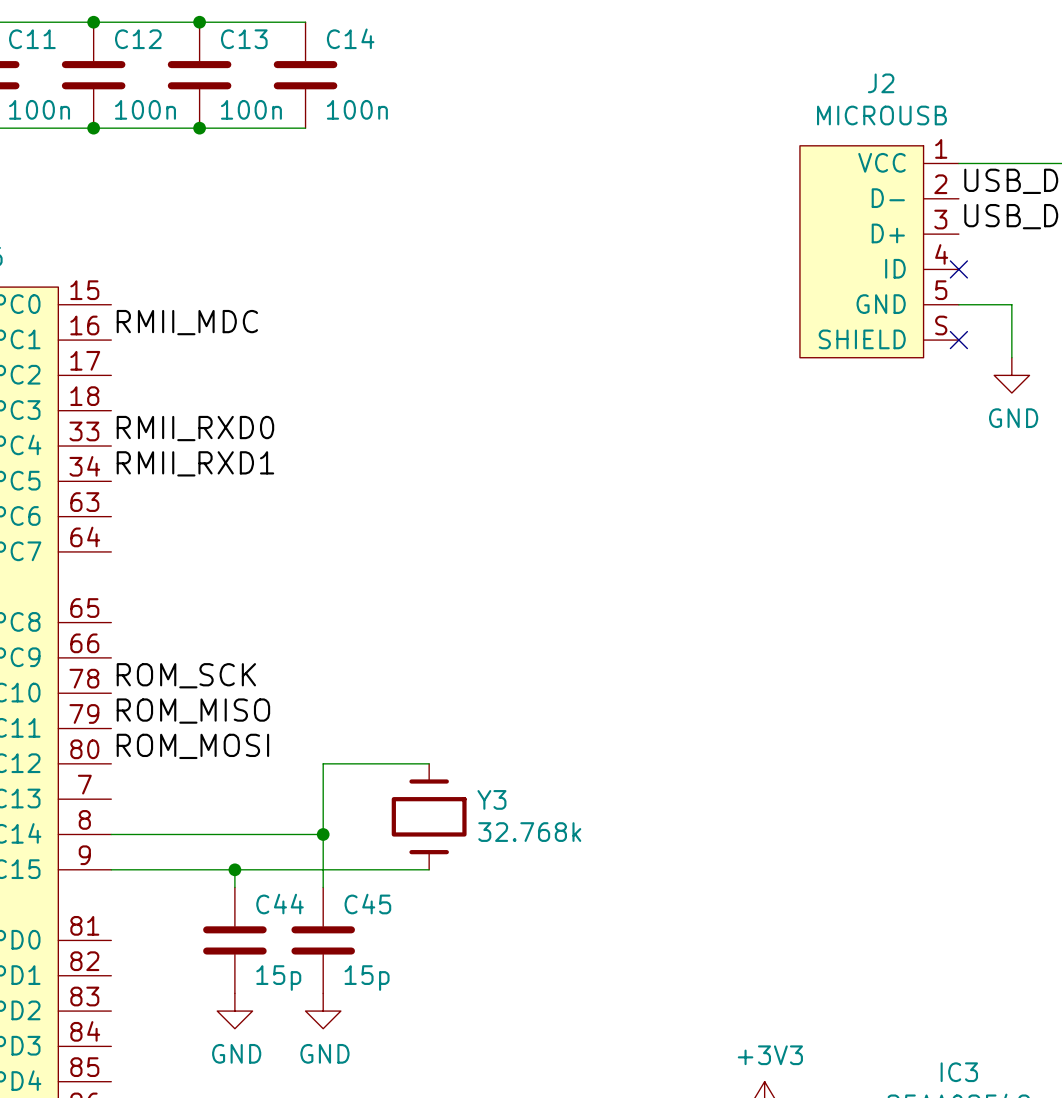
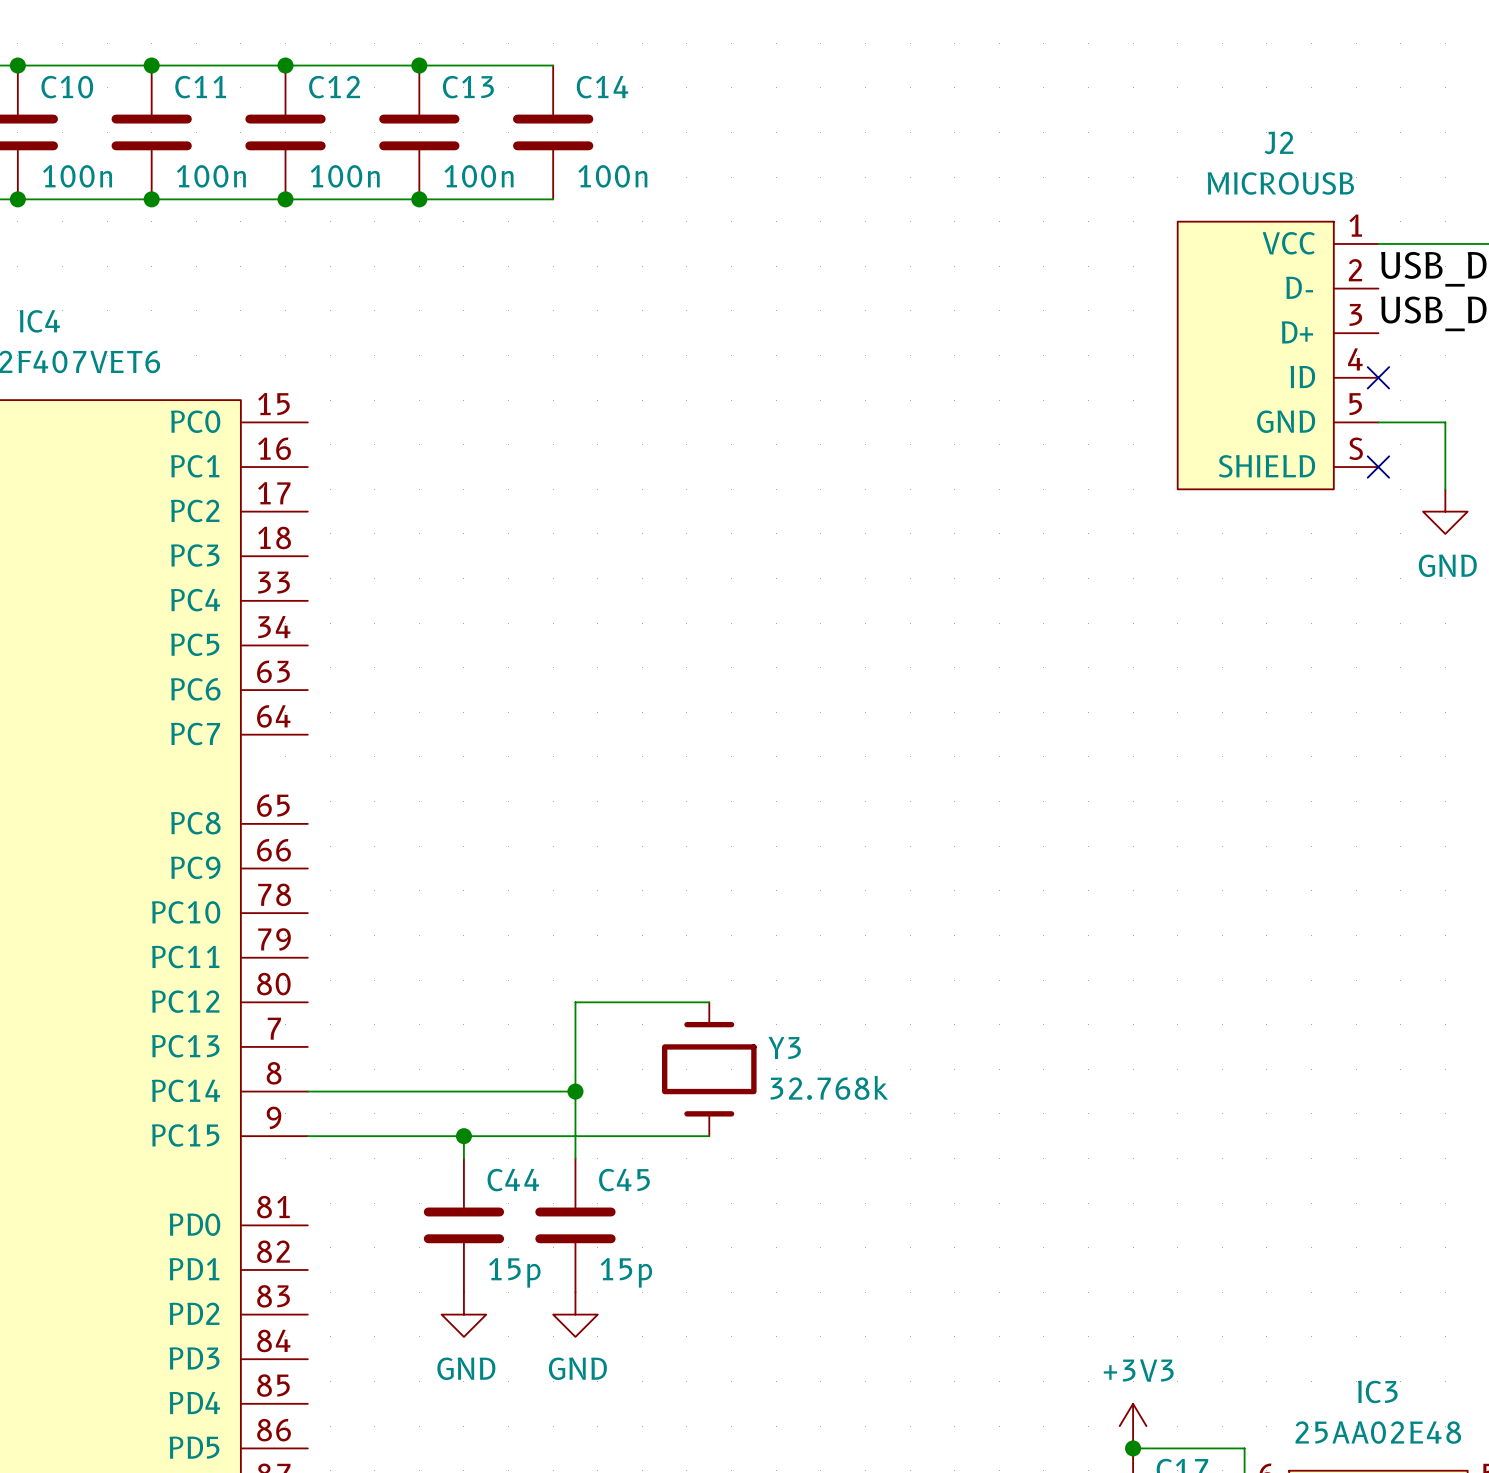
label: RMII_MDC (187, 322) -> none
label: RMII_RXD0 (195, 428) -> none
label: RMII_RXD1 (195, 463) -> none
label: ROM_SCK (186, 675) -> none
label: ROM_MISO (193, 711) -> none
label: ROM_MOSI (192, 746) -> none

